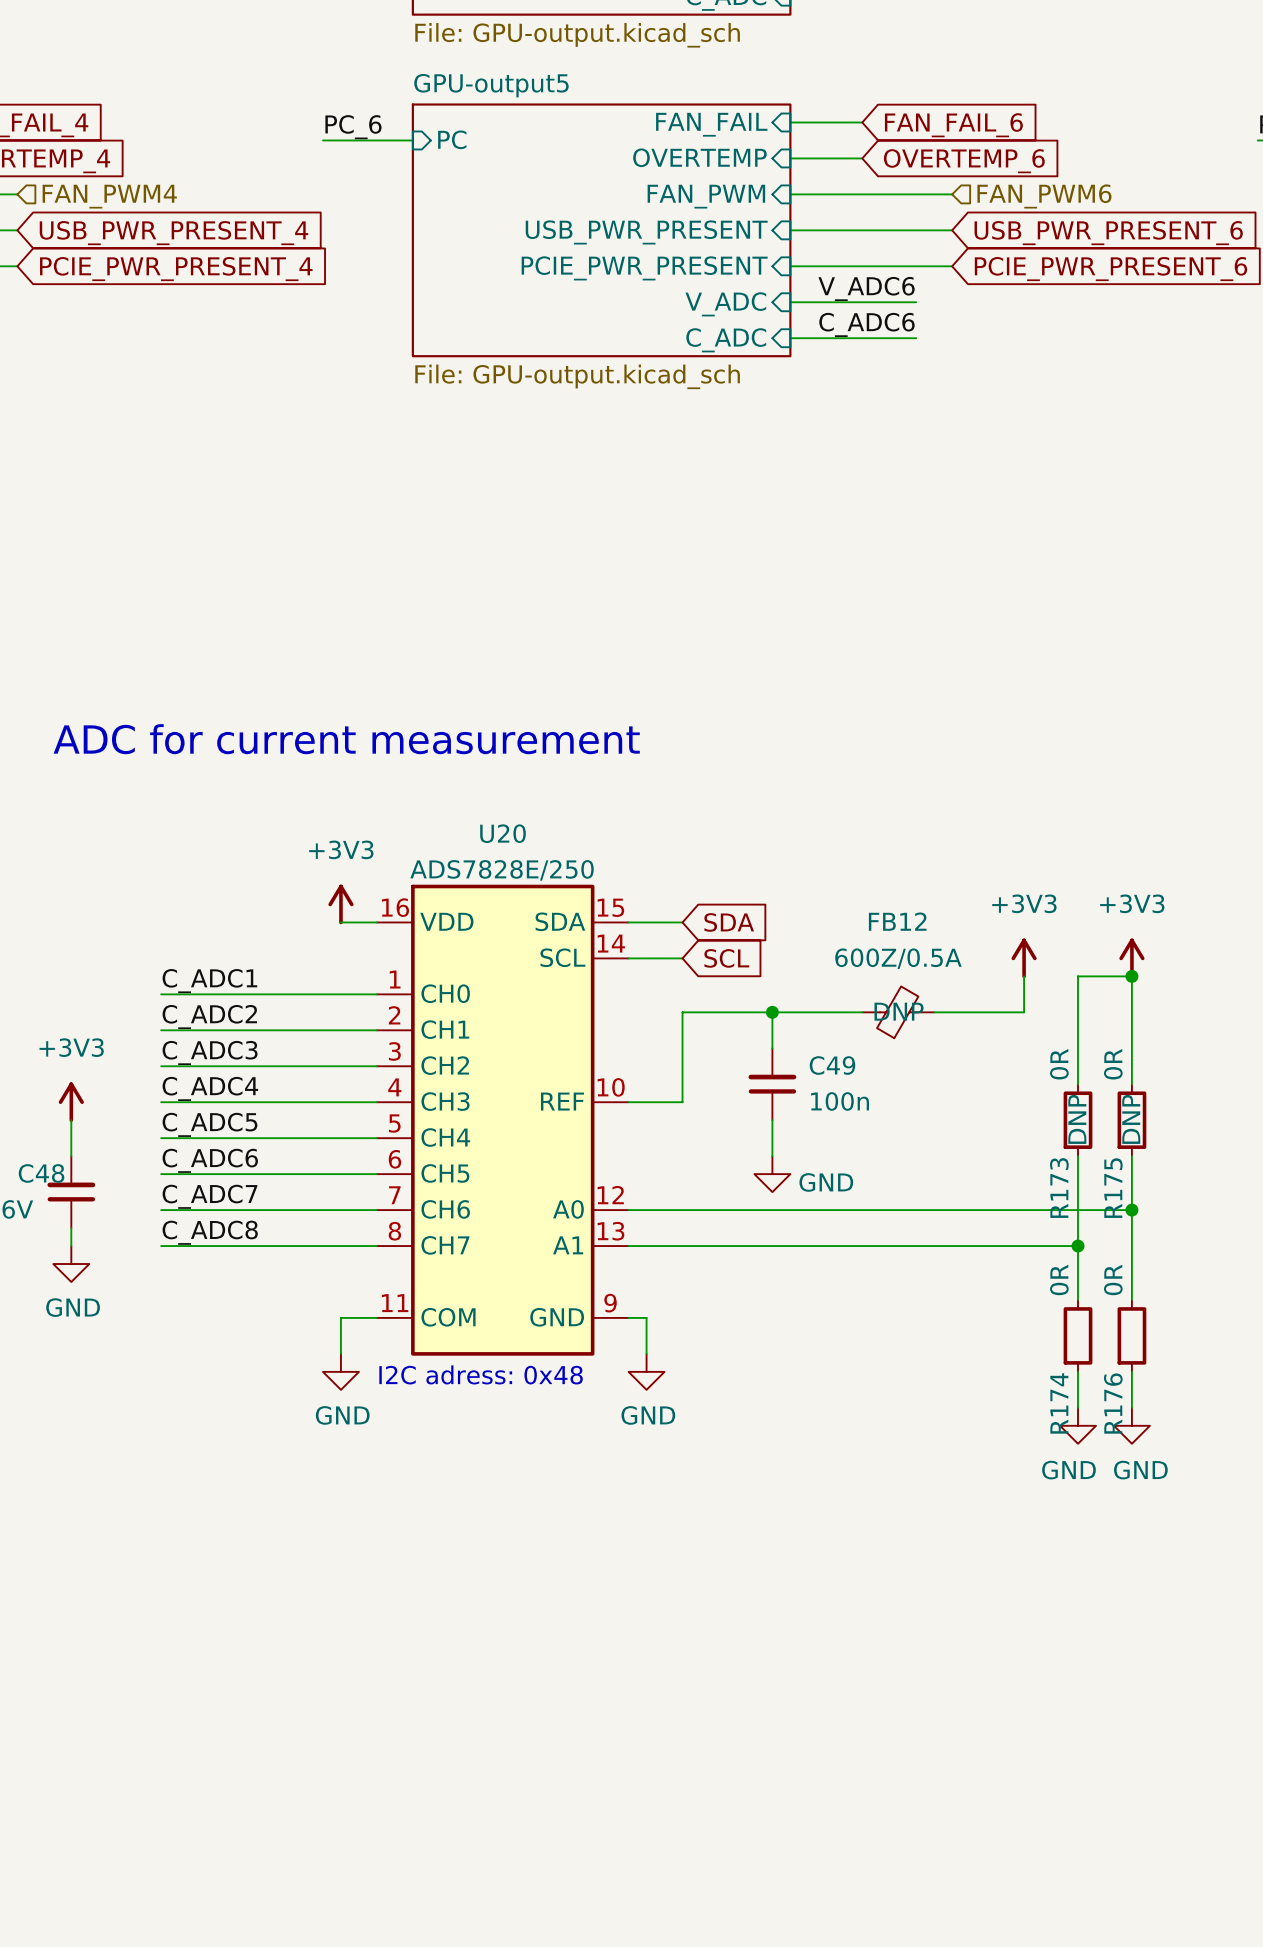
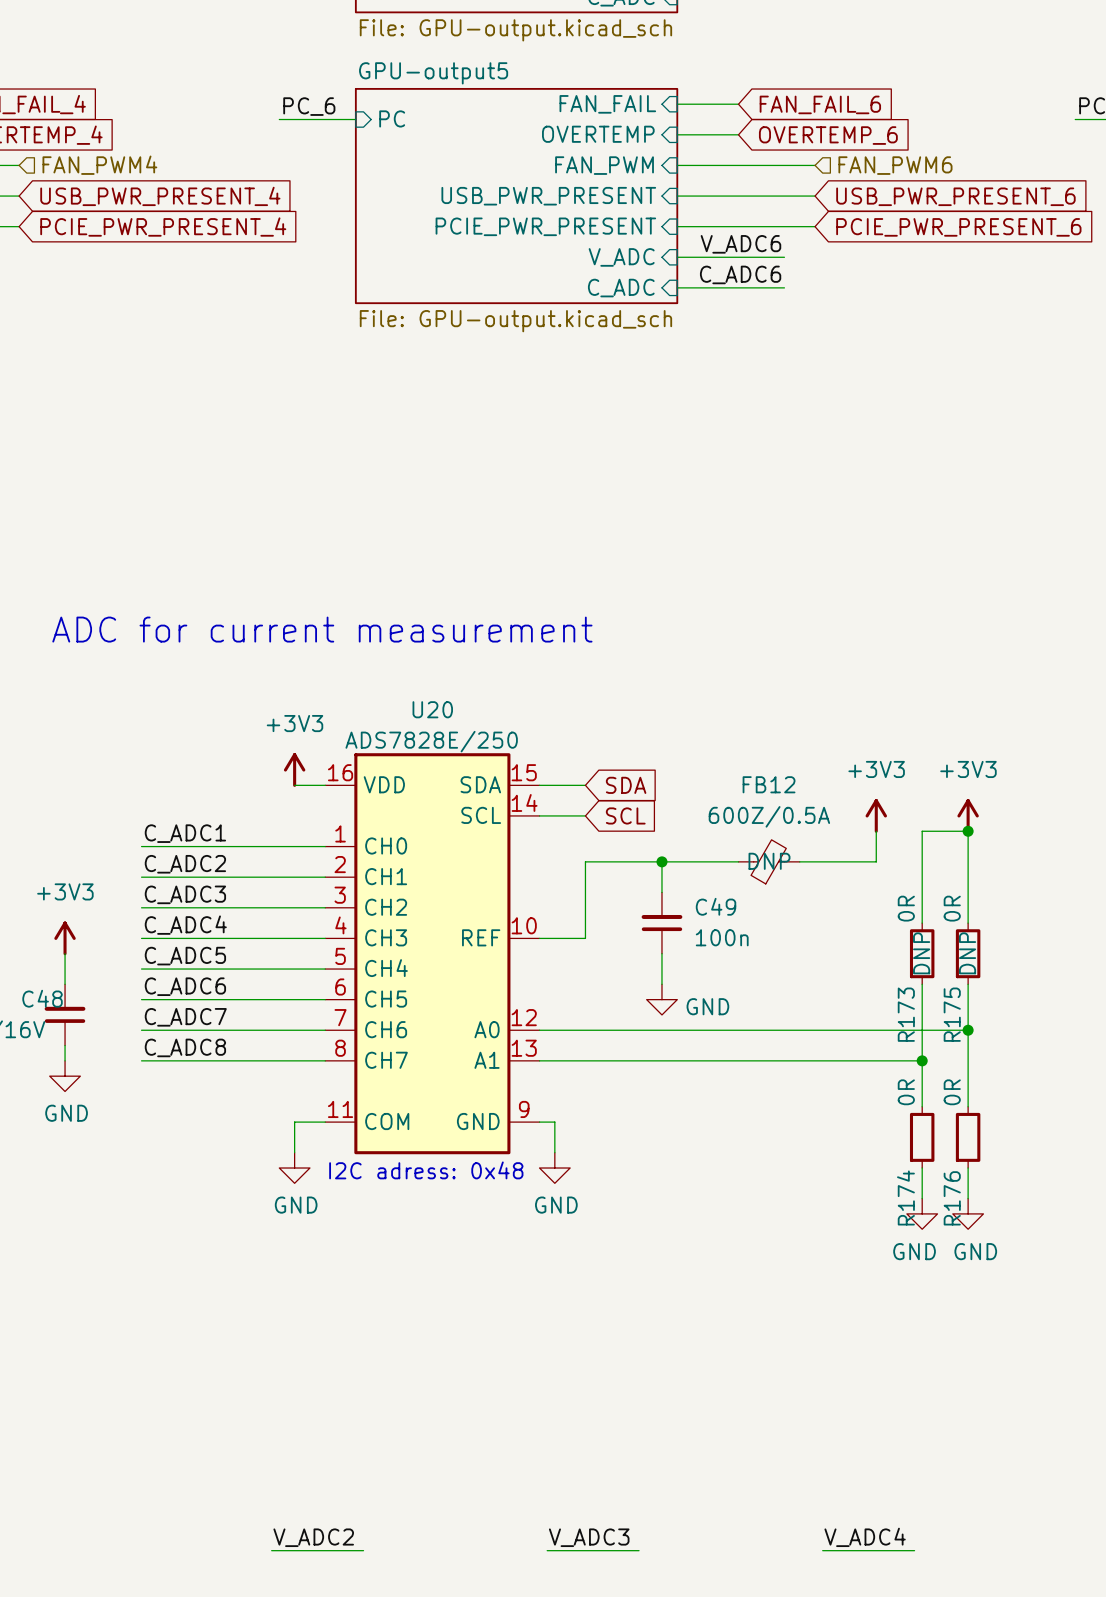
label: none -> V_ADC2 (313, 1537)
label: none -> V_ADC3 (589, 1537)
label: none -> V_ADC4 (865, 1537)
wire: none -> (271, 1550) (363, 1550)
wire: none -> (547, 1550) (639, 1550)
wire: none -> (822, 1550) (914, 1550)

